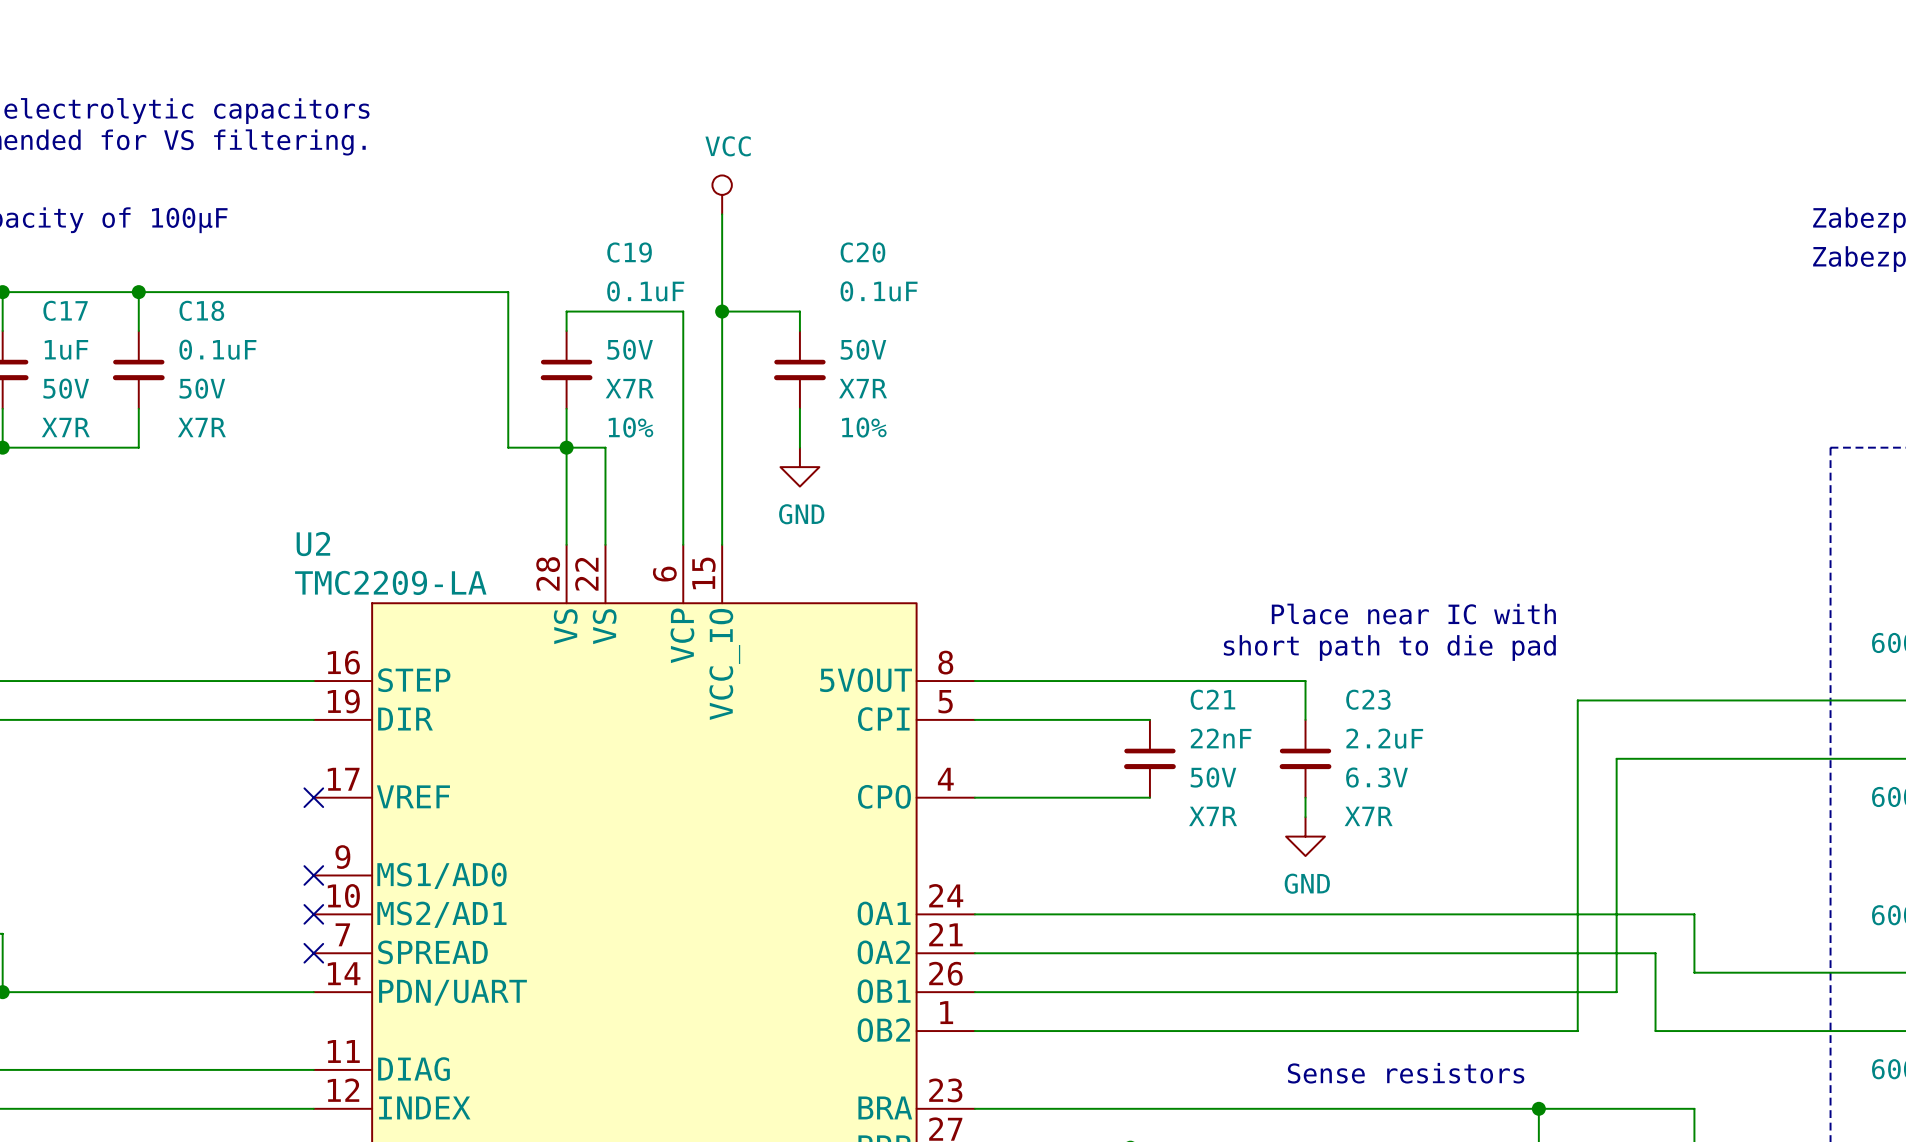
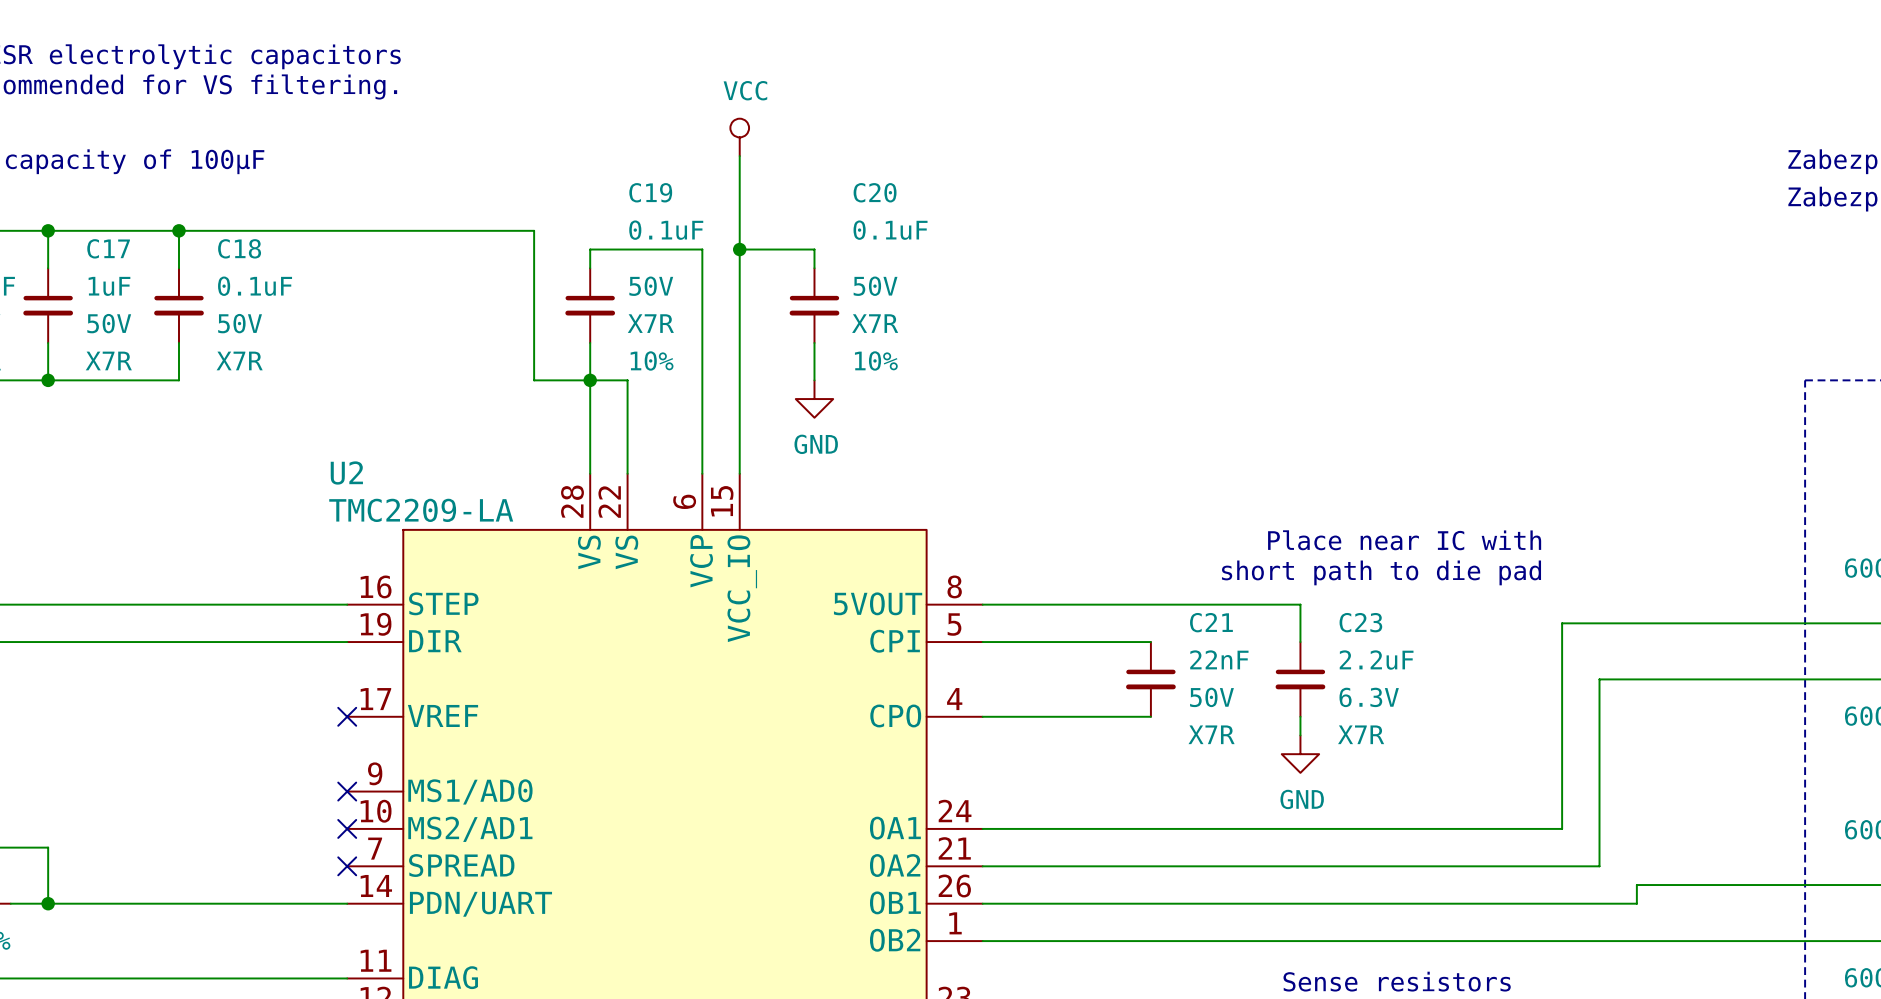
wire: (1655, 972) (1655, 953) (1616, 953) (1616, 992) -> (1636, 903) (1599, 903)
wire: none -> (1636, 885) (1674, 885)
wire: (1694, 972) (1694, 914) (1577, 914) (1577, 1031) -> (1636, 941) (1562, 941)
wire: (1655, 992) (1655, 1031) -> none

